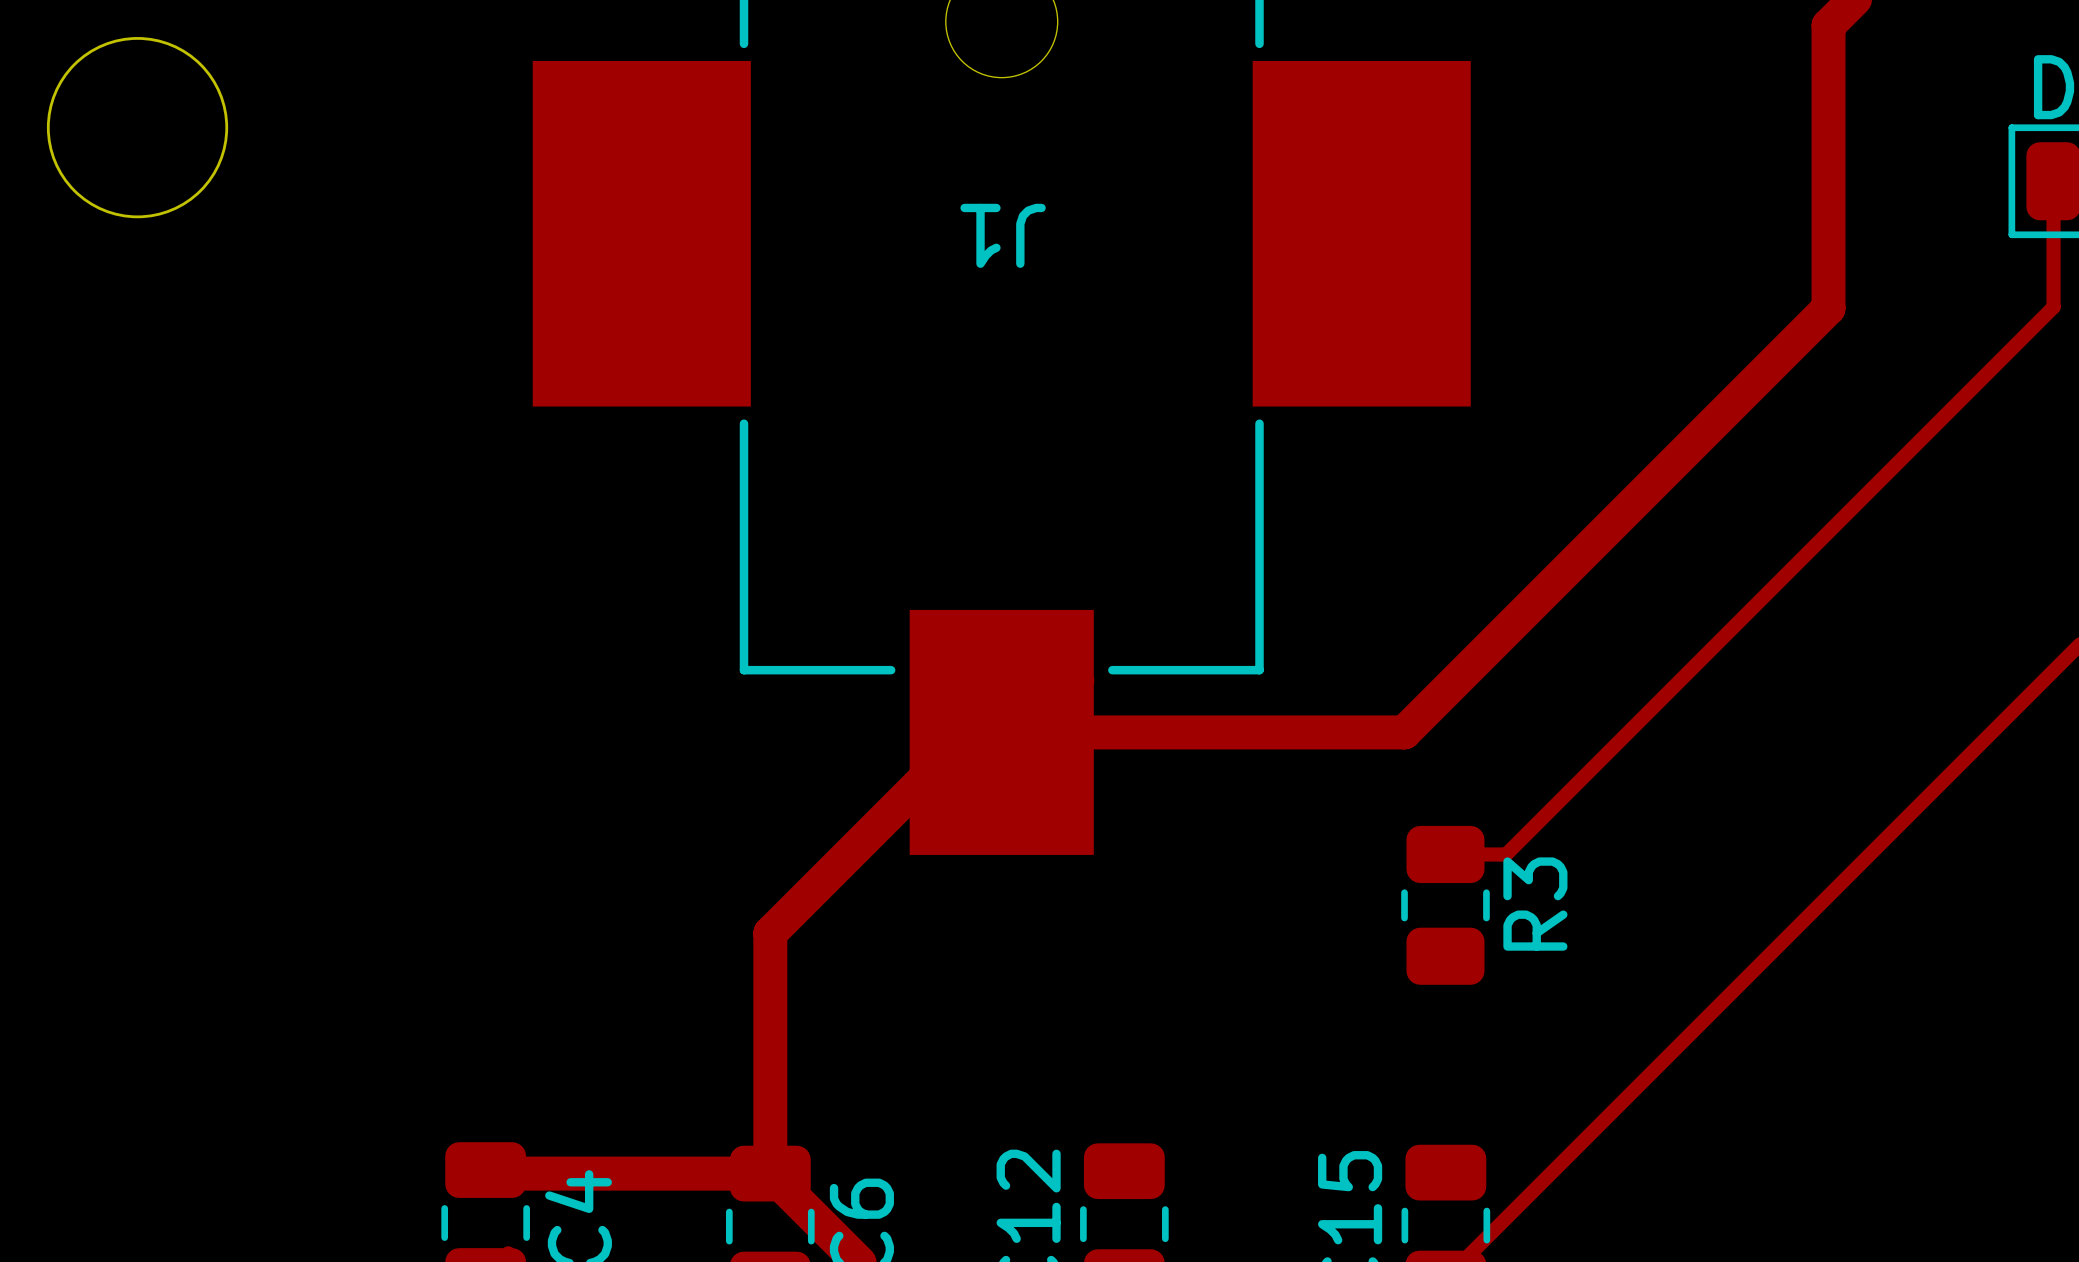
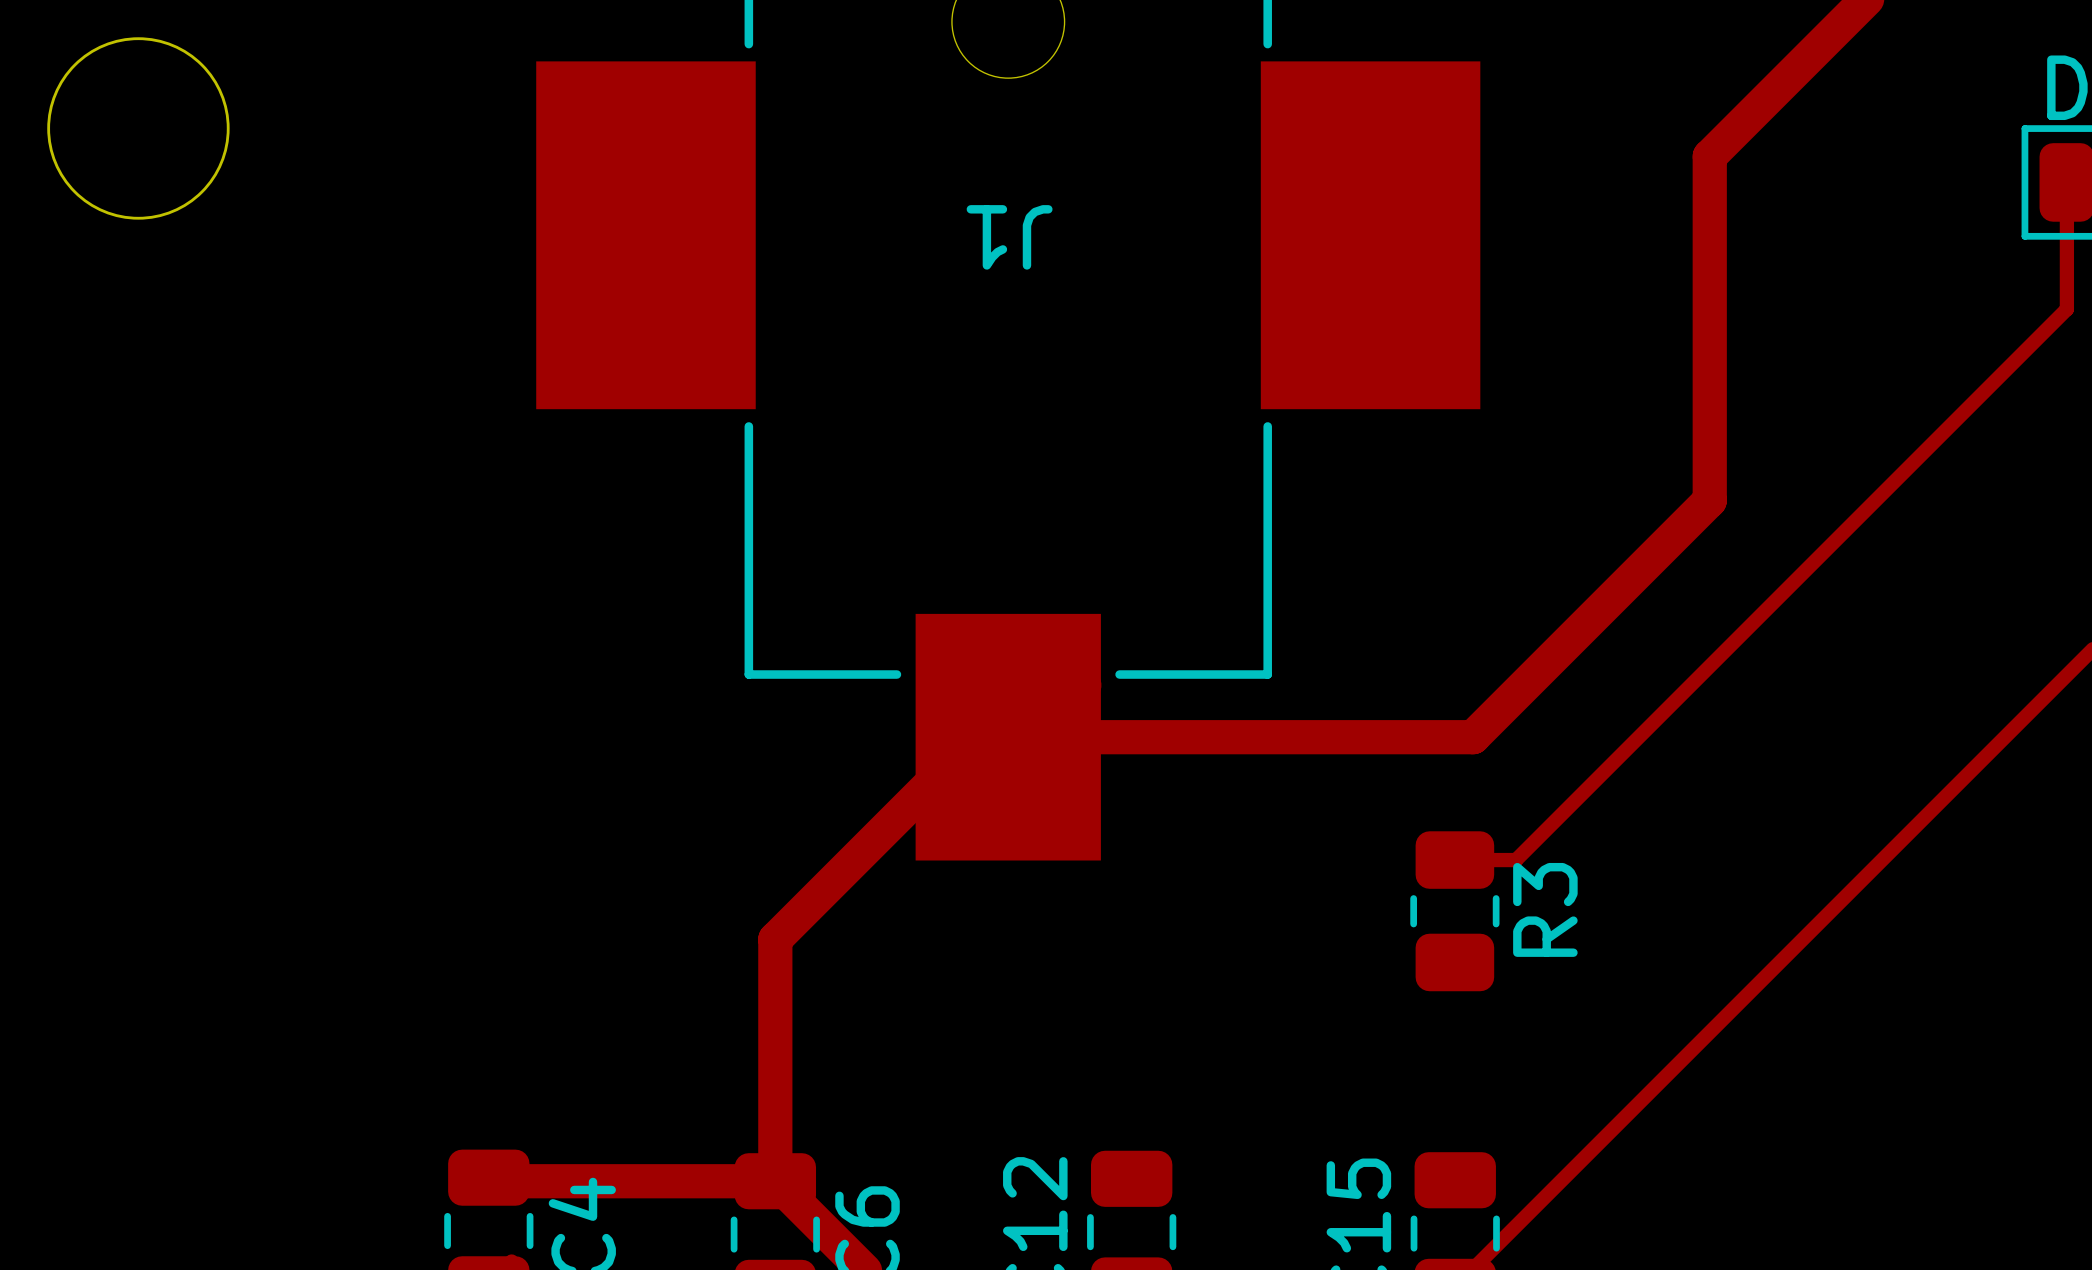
top track: (1828, 25) (1828, 308) (1404, 732) -> (1840, 25) (1709, 156) (1709, 500) (1473, 737) (1413, 737)

